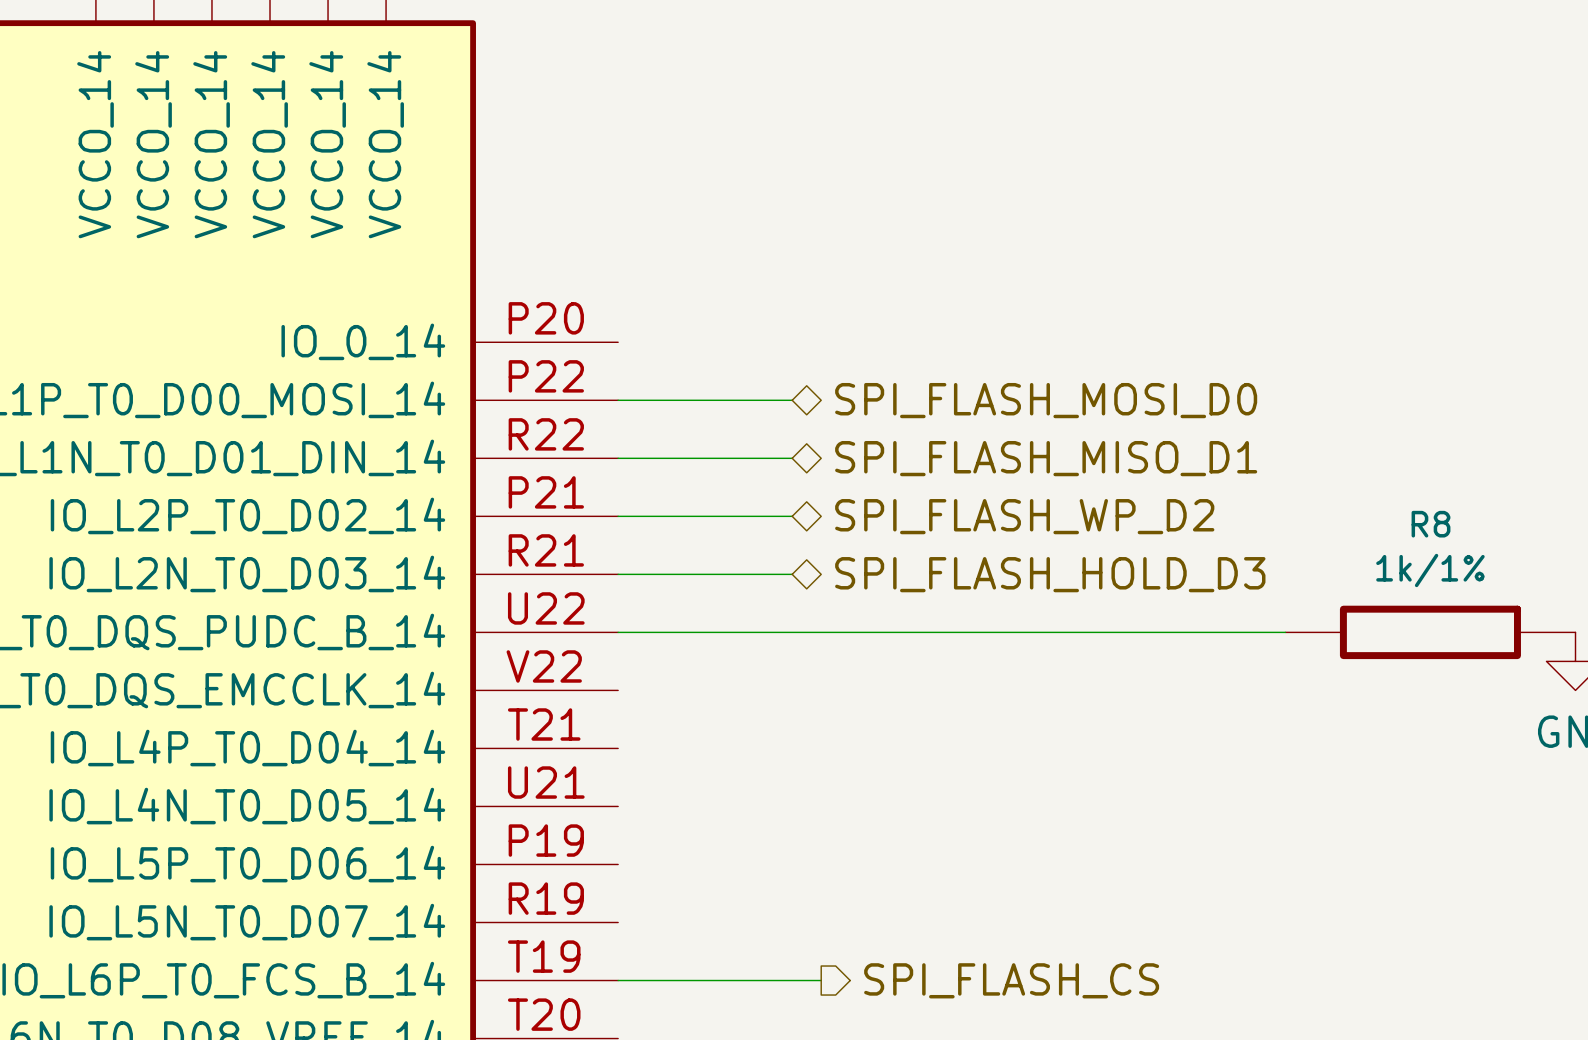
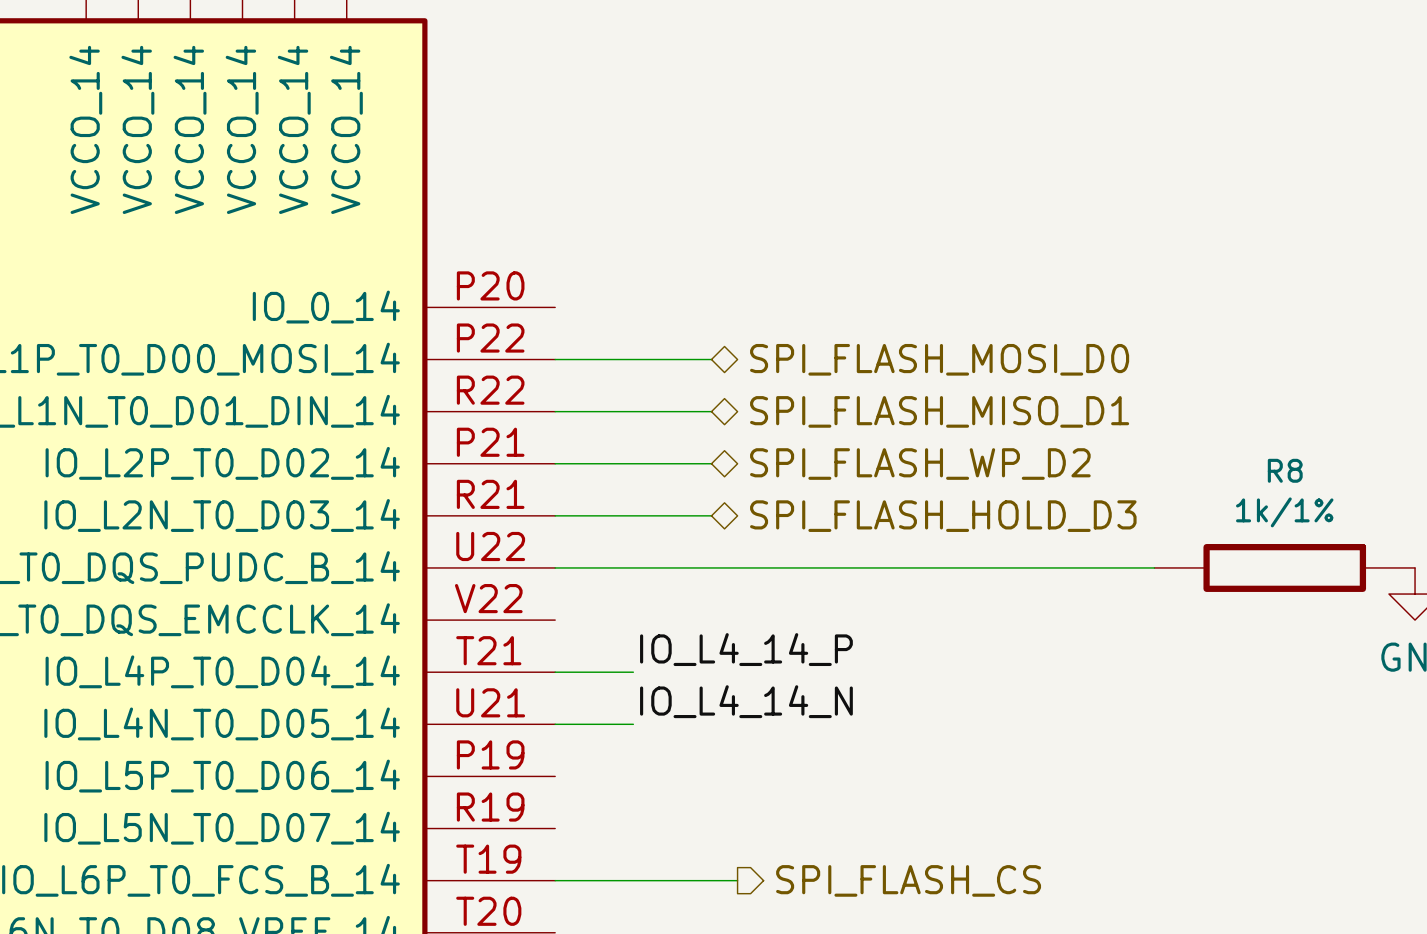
label: none -> IO_L4_14_P (746, 649)
wire: none -> (555, 672) (633, 672)
label: none -> IO_L4_14_N (746, 701)
wire: none -> (555, 724) (633, 724)

